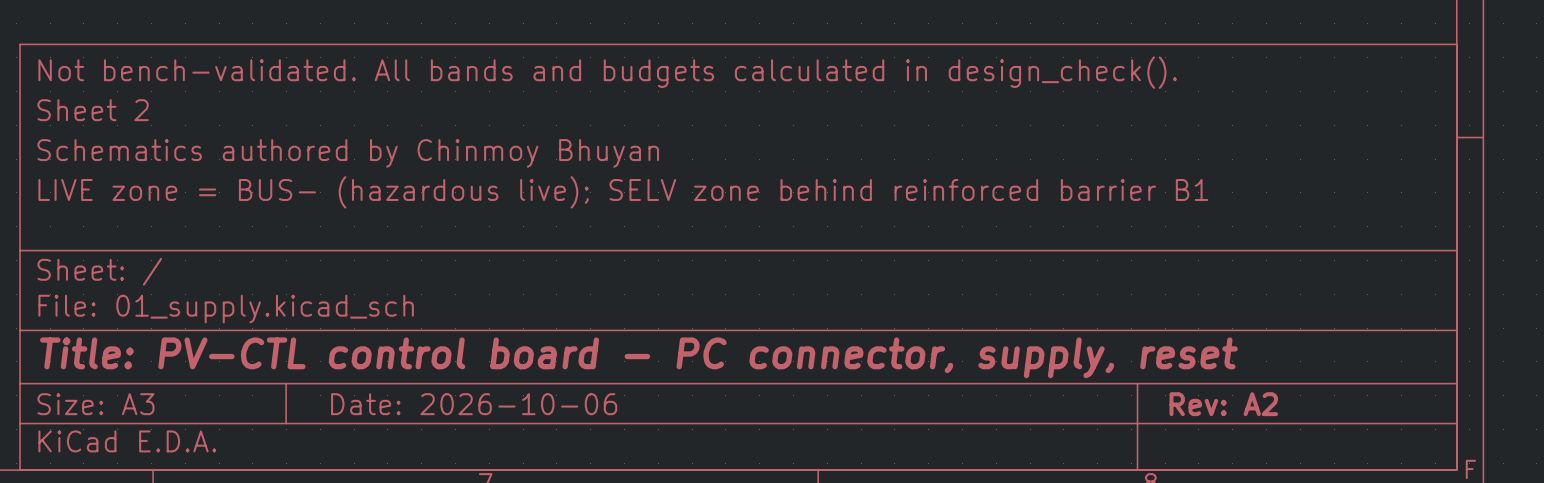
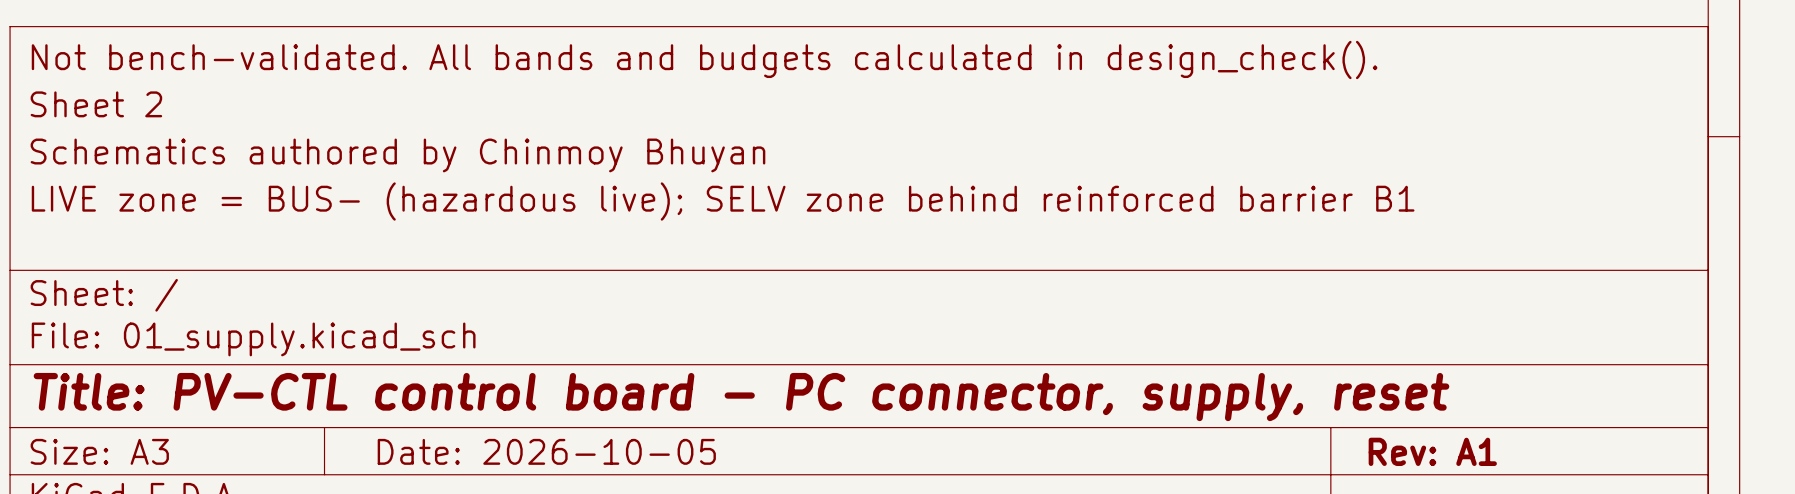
title block: Date: 2026-10-06 (474, 404) -> Date: 2026-10-05 (546, 451)
title block: Rev: A2 (1223, 404) -> Rev: A1 (1432, 451)

